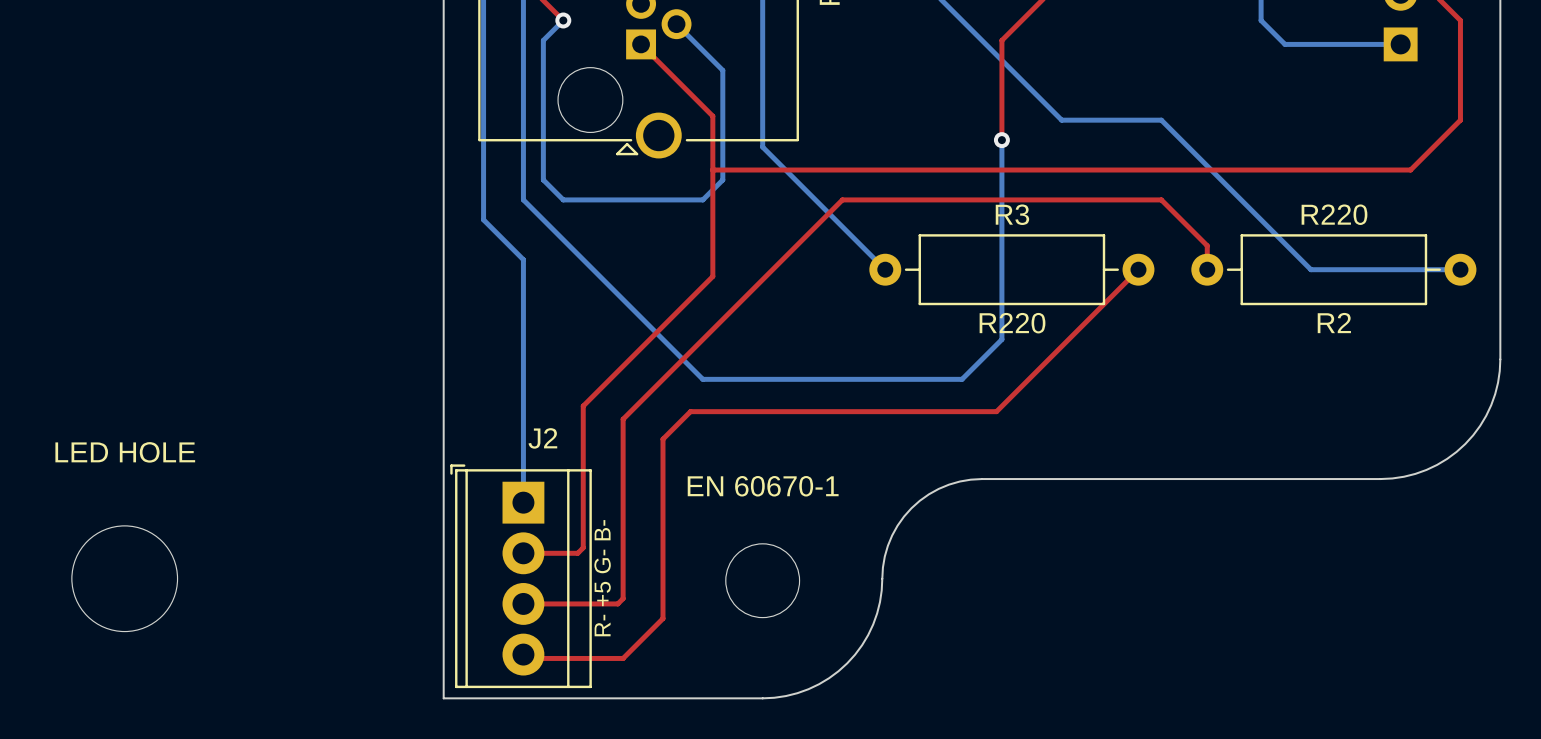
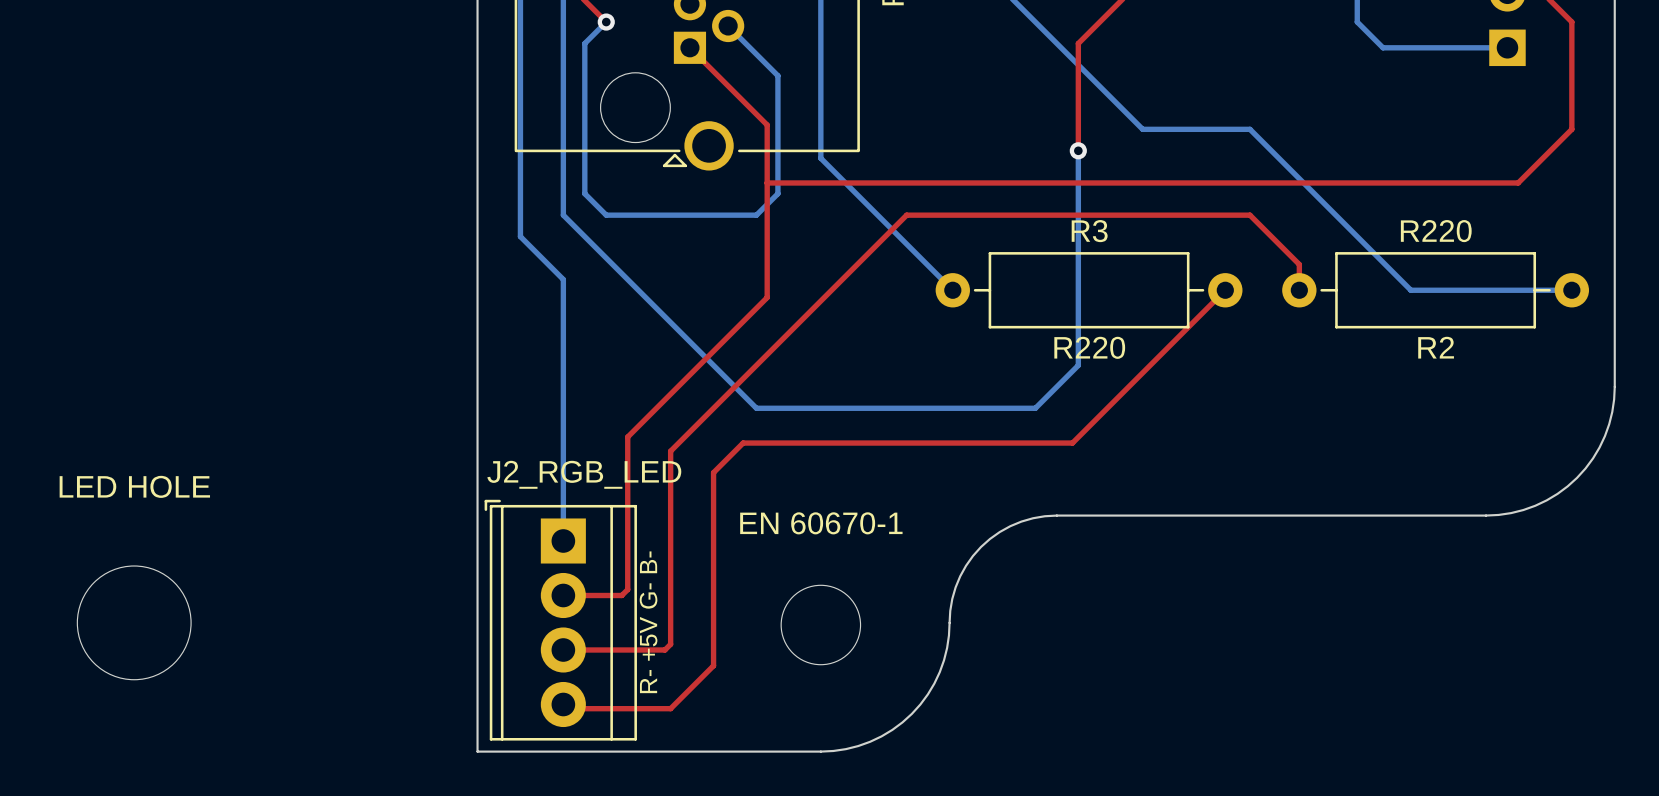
J2 name: J2 (542, 438) -> J2_RGB_LED (584, 474)
J2 value: R- +5 G- B- (602, 578) -> R- +5V G- B- (648, 622)

